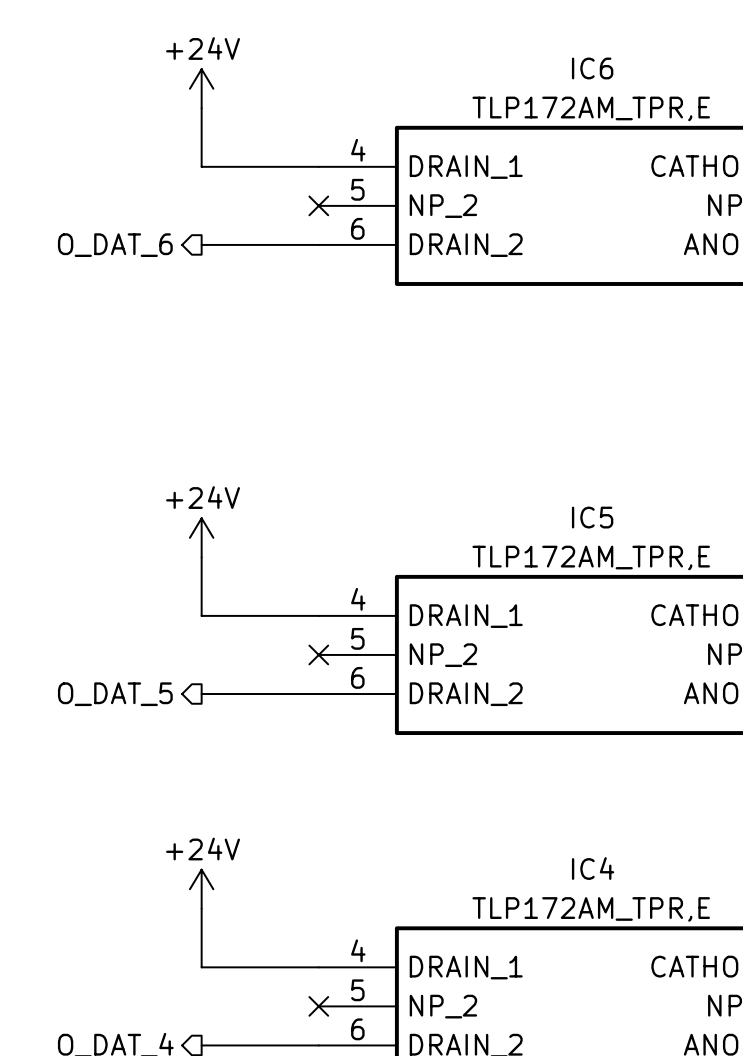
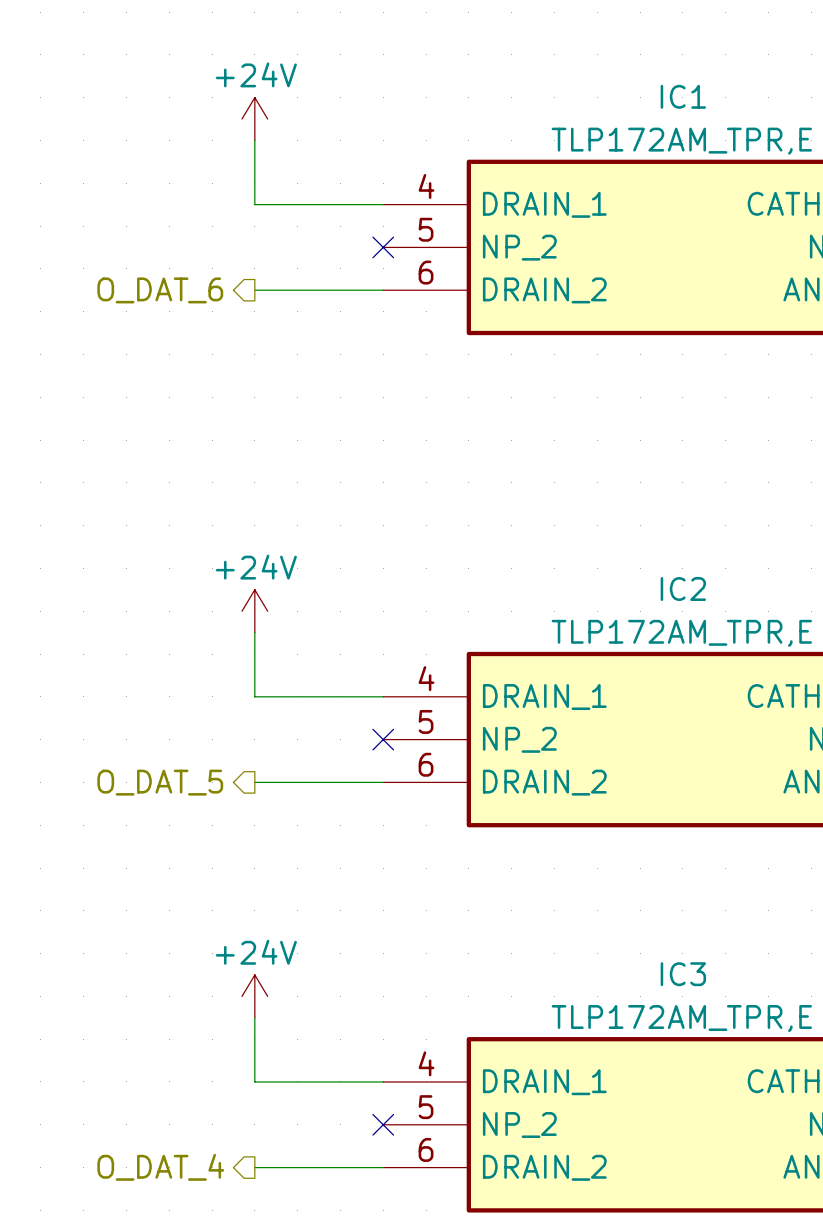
IC6 name: IC6 (592, 68) -> IC1 (683, 96)
IC5 name: IC5 (592, 517) -> IC2 (683, 589)
IC4 name: IC4 (593, 868) -> IC3 (683, 974)

